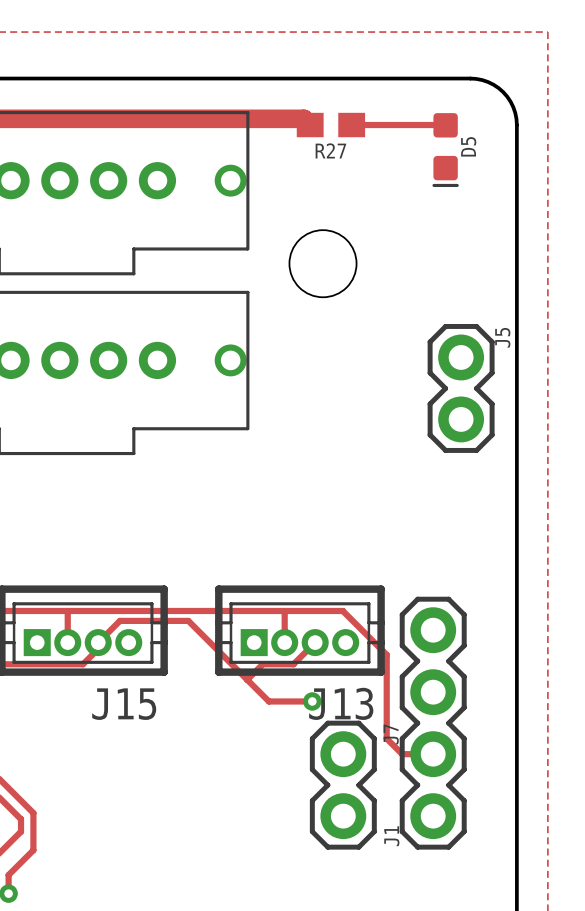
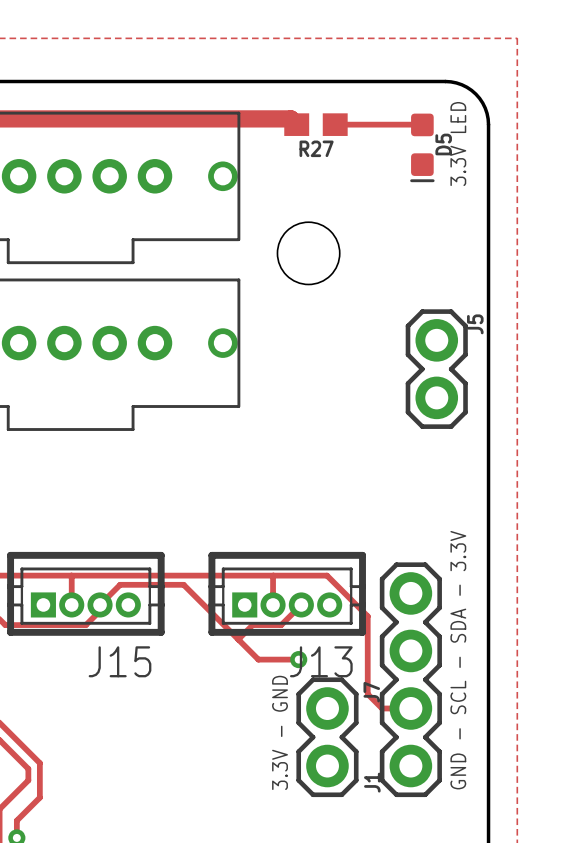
text: none -> 3.3V LED (458, 144)
text: none -> GND - SCL - SDA - 3.3V (458, 660)
text: none -> 3.3V - GND (280, 732)

